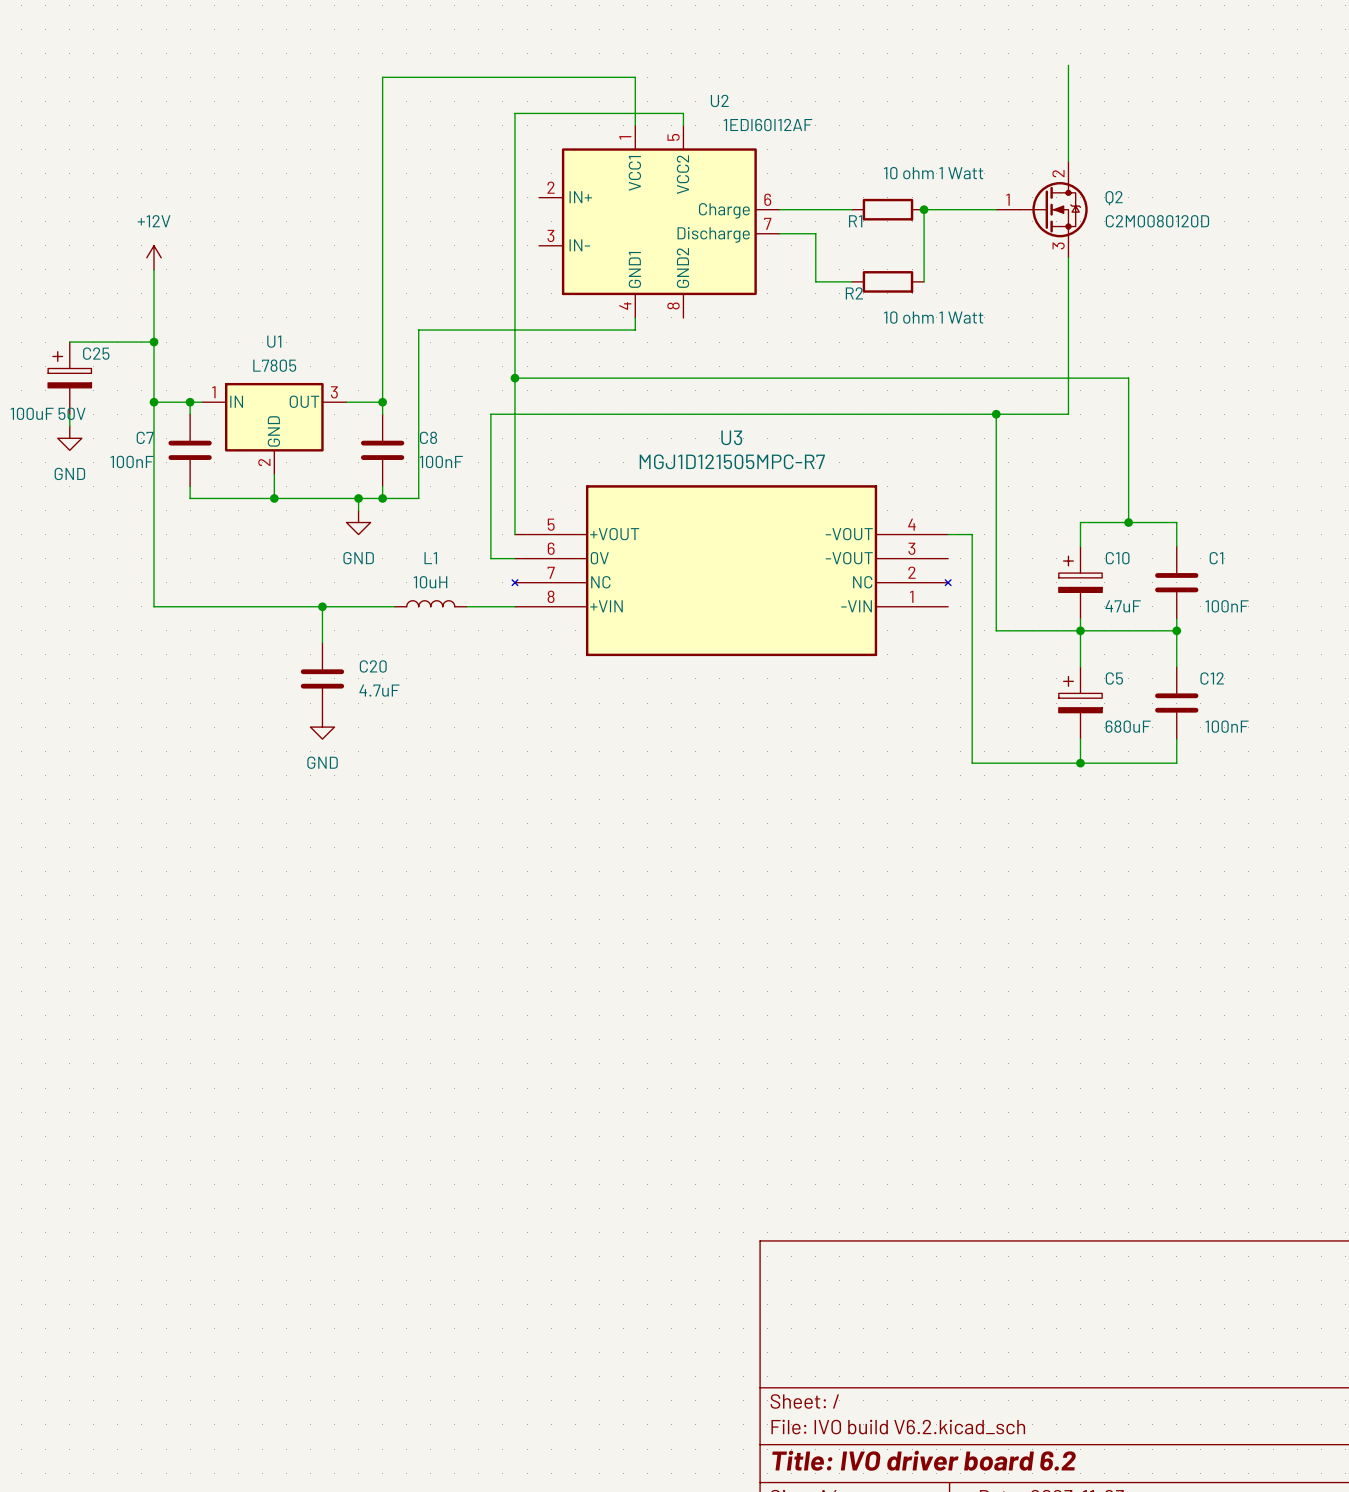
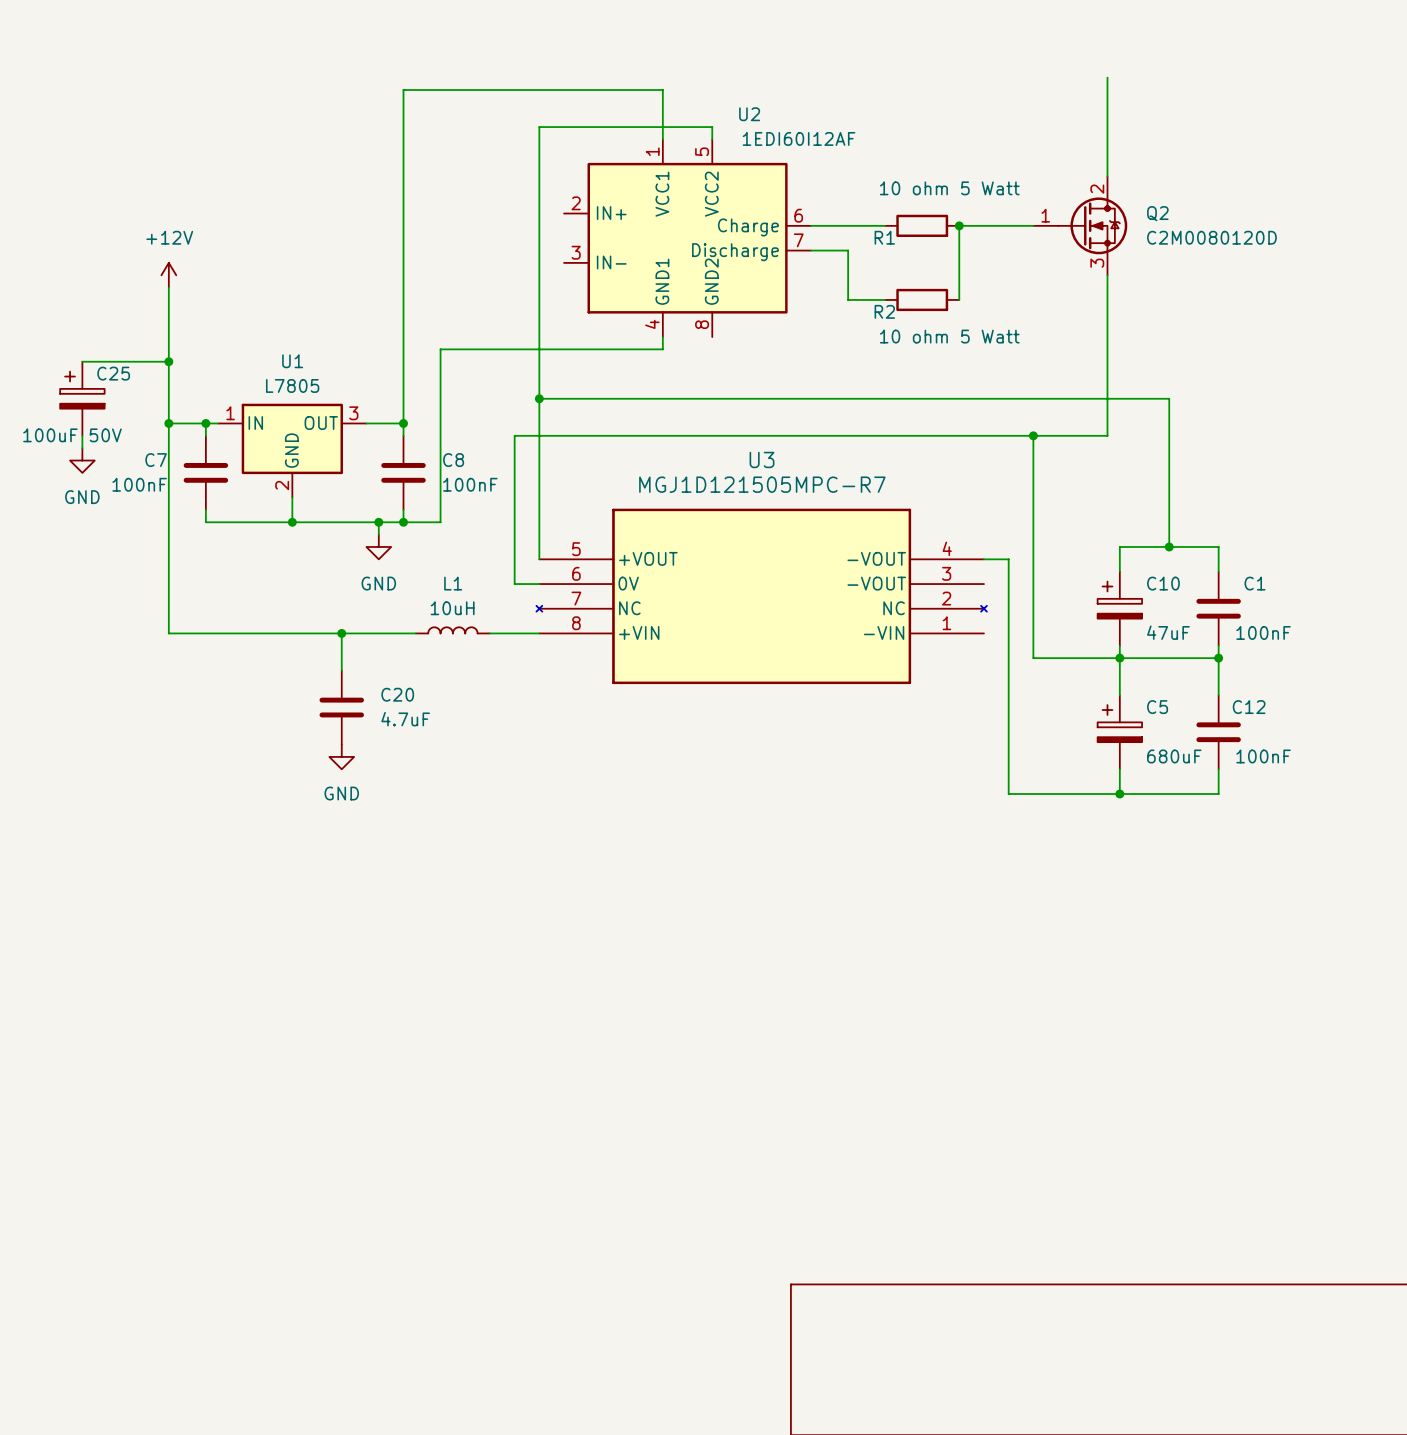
R1 value: 10 ohm 1 Watt (933, 173) -> 10 ohm 5 Watt (949, 188)
R2 value: 10 ohm 1 Watt (933, 317) -> 10 ohm 5 Watt (949, 336)

